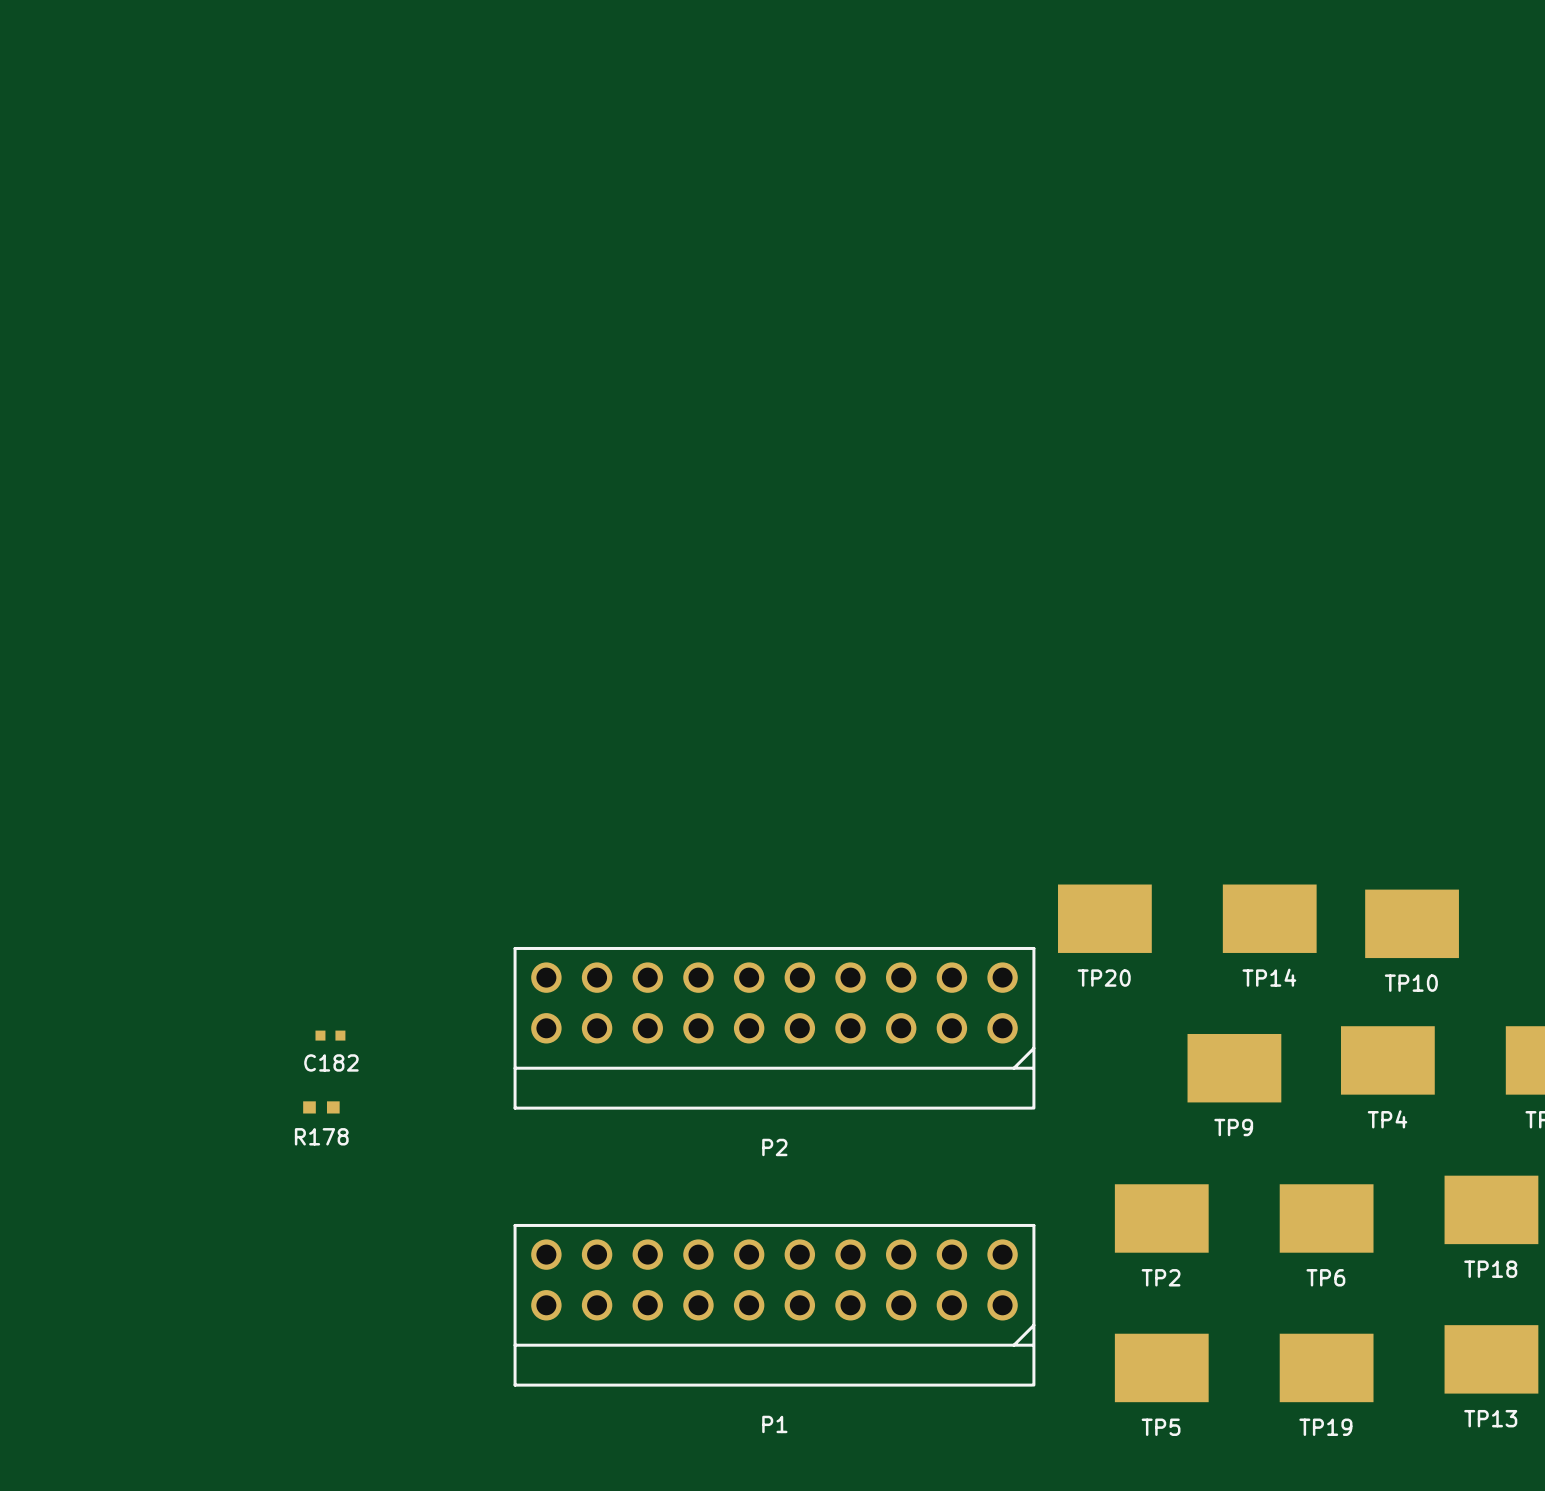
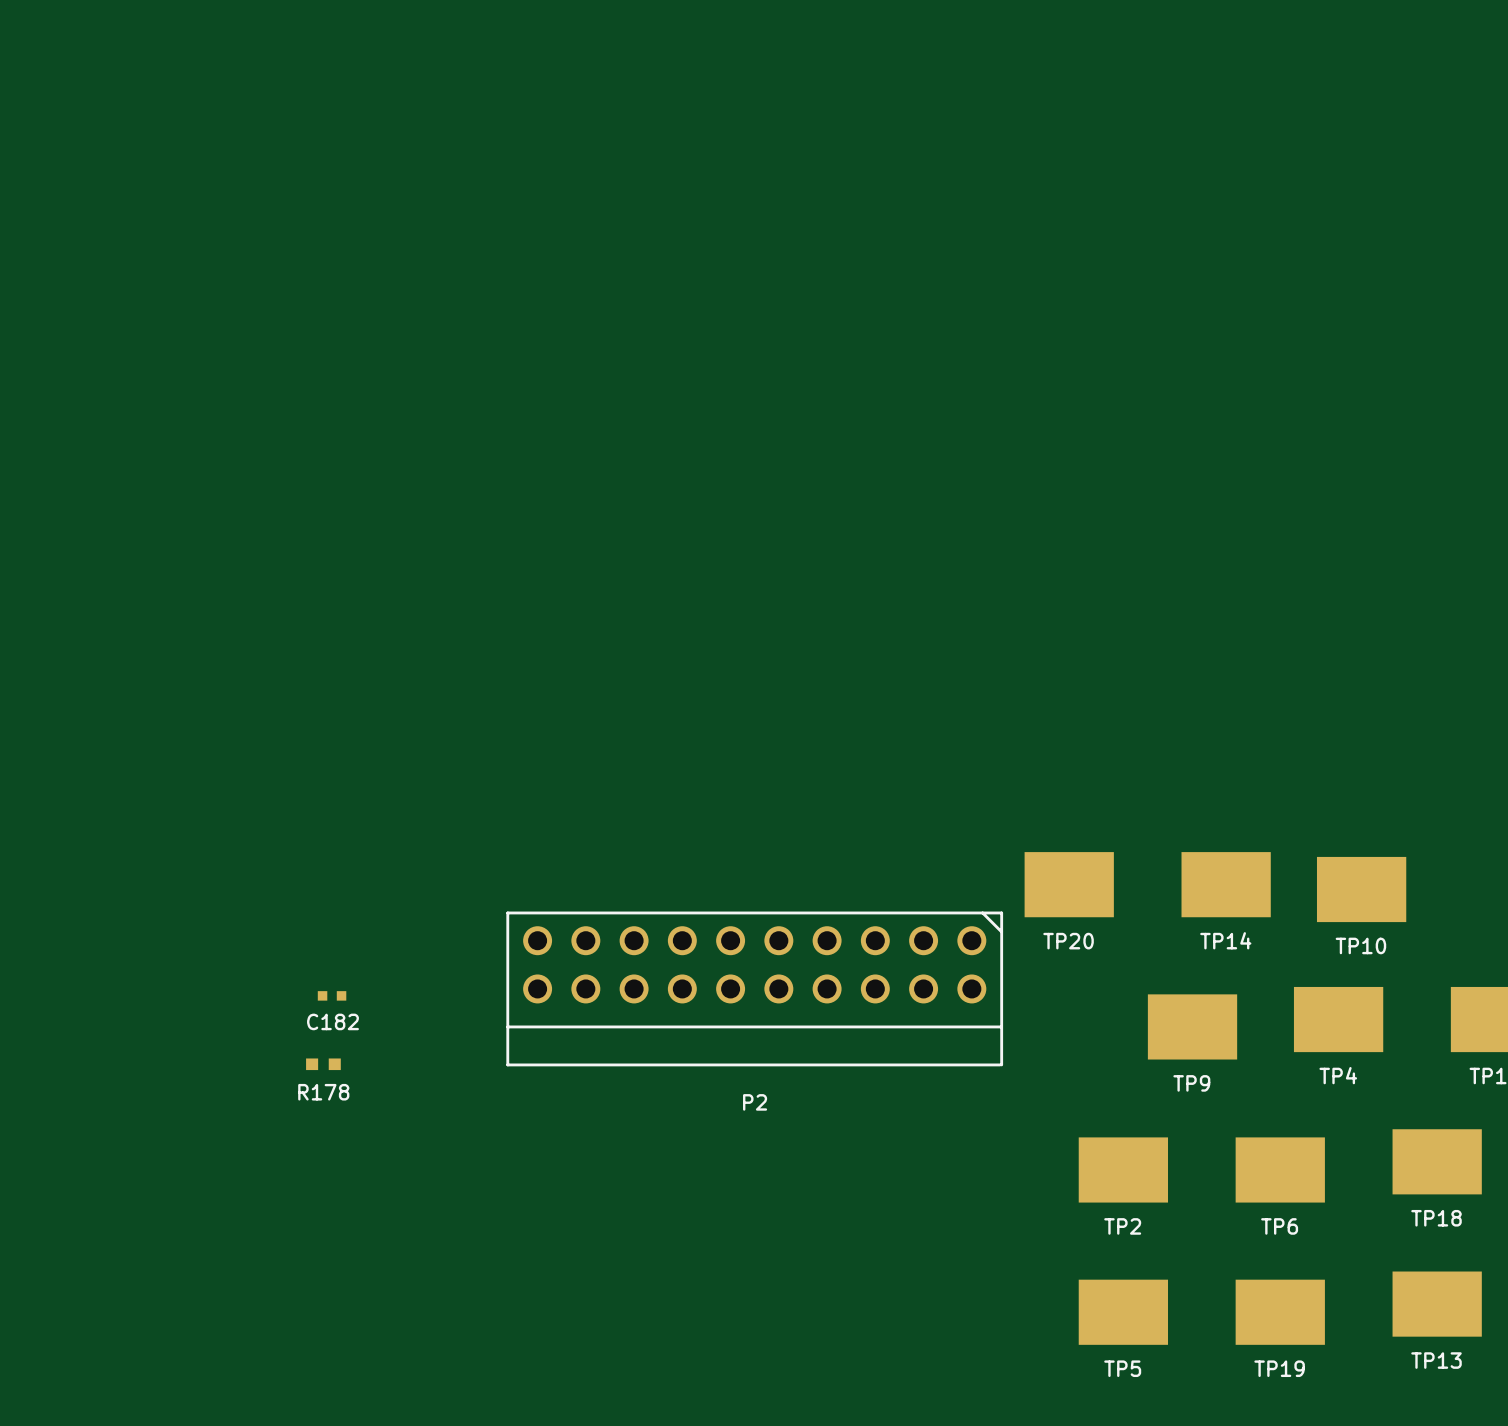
P2 footprint: [513, 946, 1036, 1110] -> [506, 911, 1004, 1067]
P1: (774, 1305) -> none

